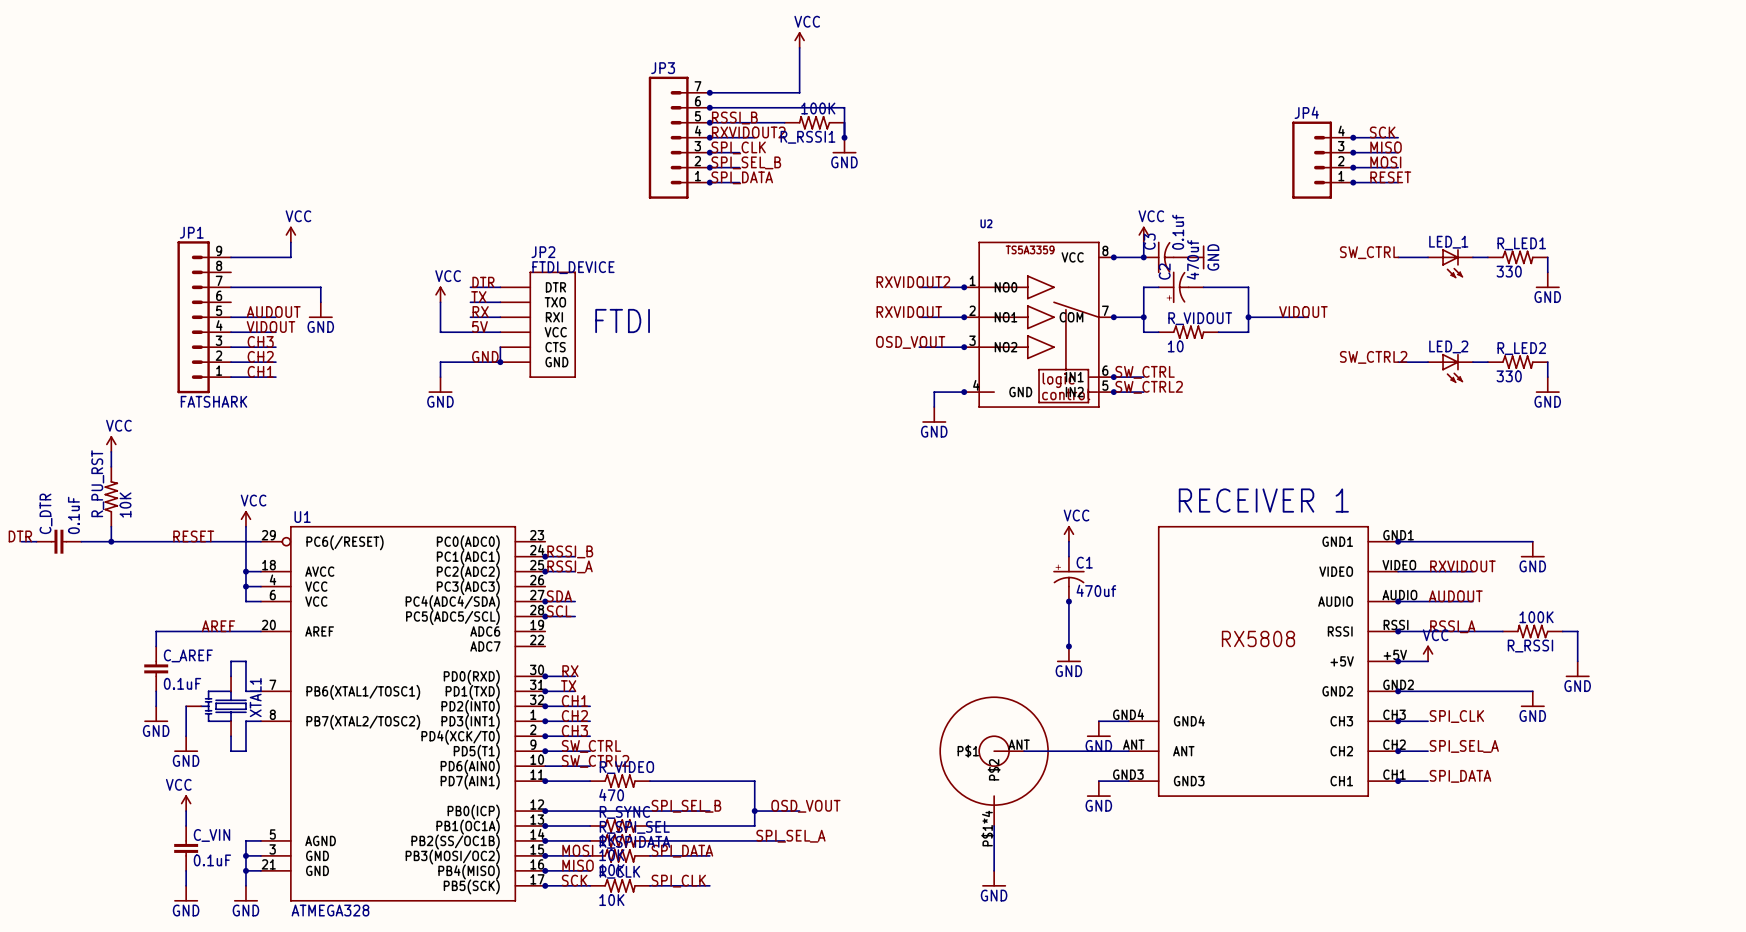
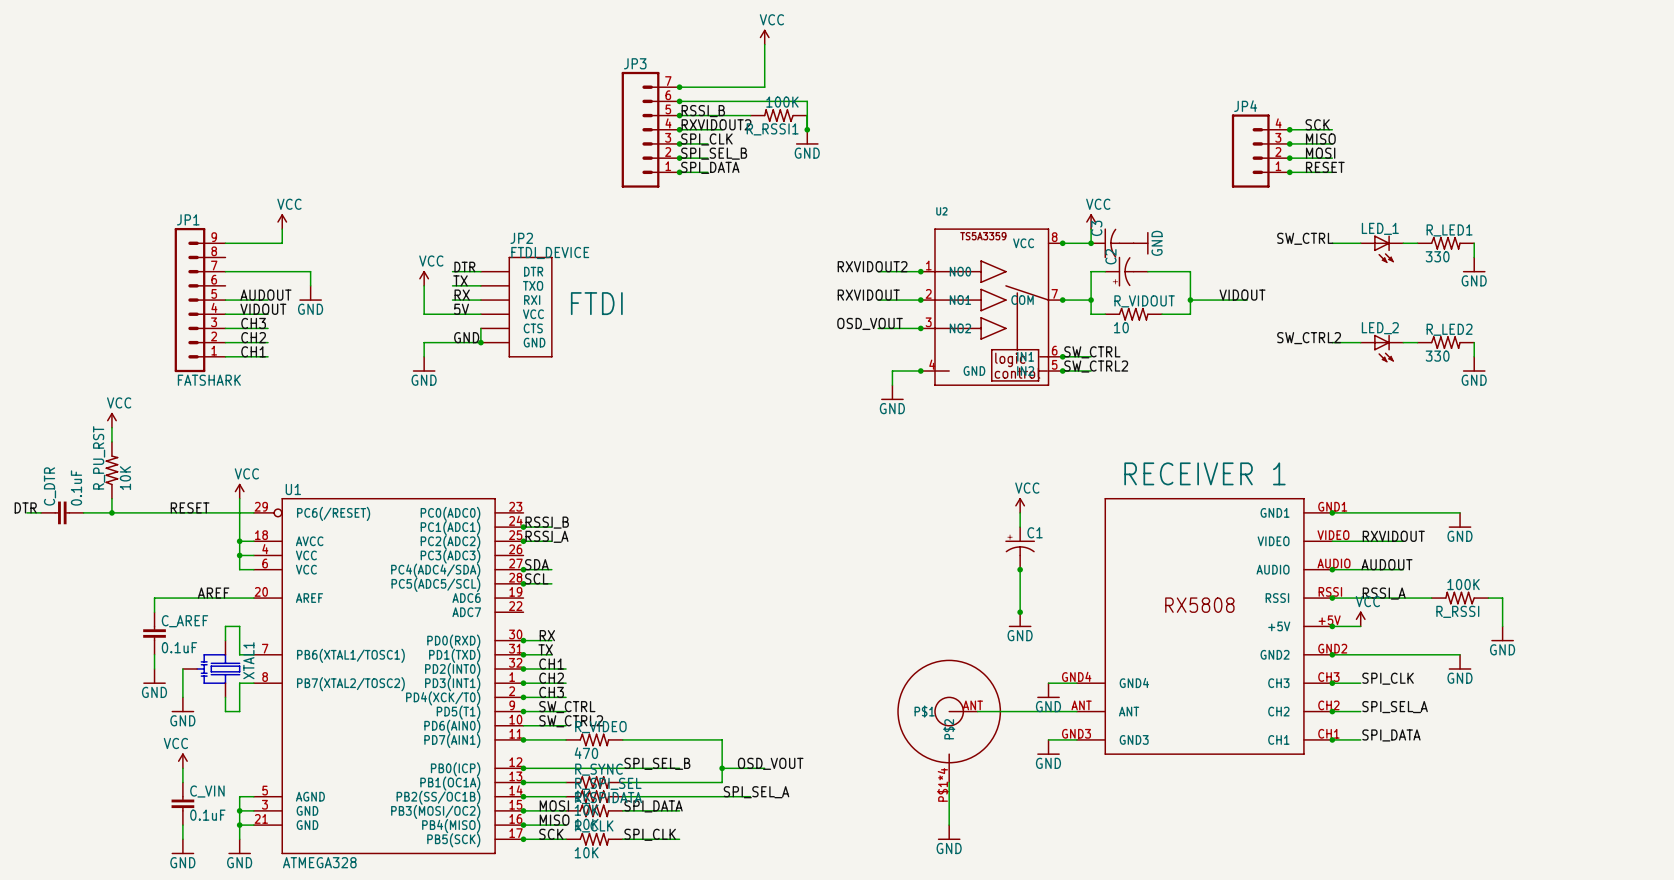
C3 value: 0.1uf (1178, 232) -> none
C2 value: 470uf (1192, 259) -> none
C1 value: 470uf (1096, 590) -> none

